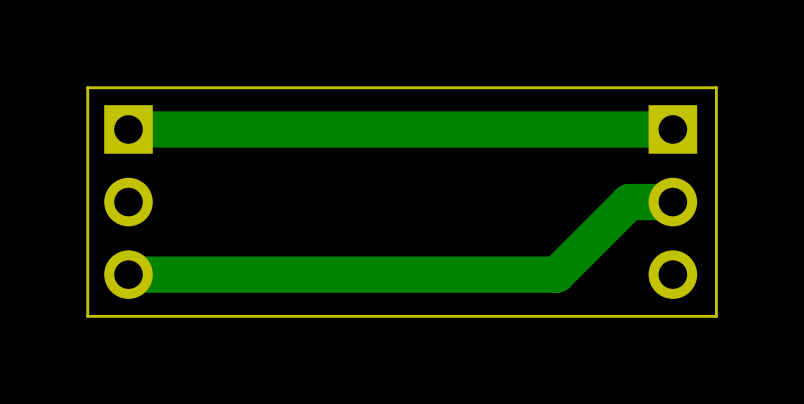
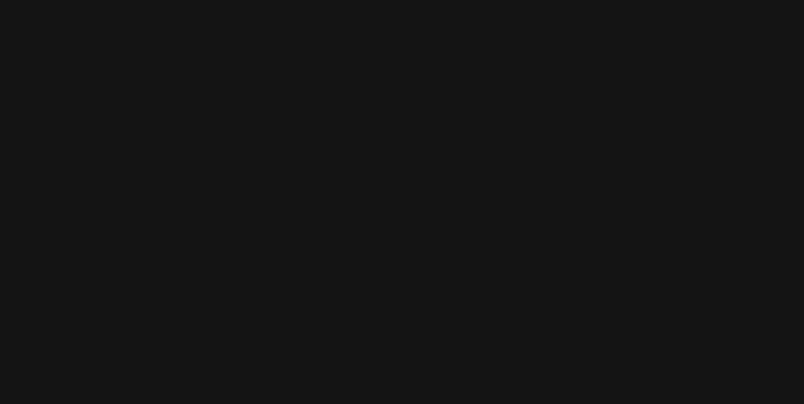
board edge: (716, 87) (87, 87) (87, 316) (716, 316) (716, 87) -> none
track: (672, 129) (128, 129) -> none
part: (128, 202) -> none
track: (672, 202) (629, 202) (556, 274) (128, 274) -> none
part: (672, 202) -> none

